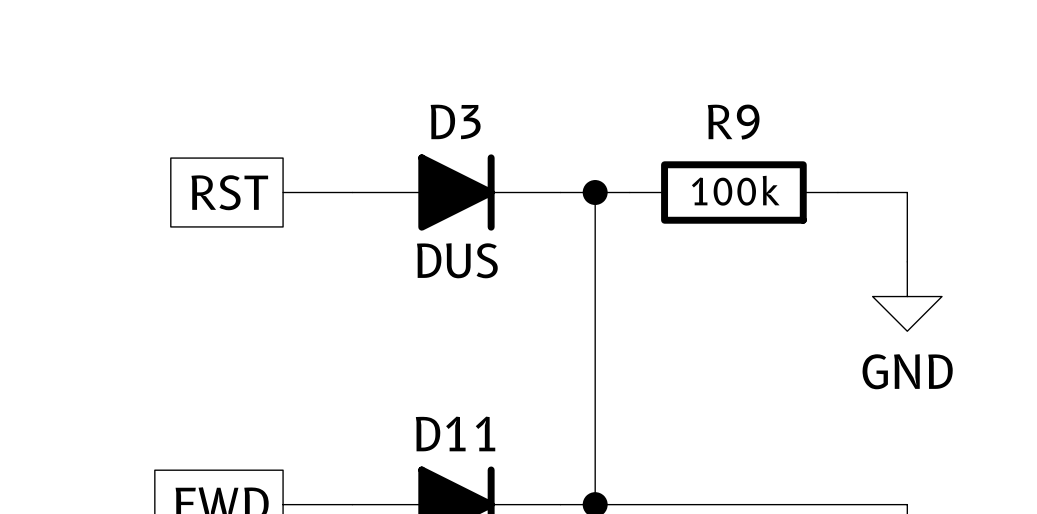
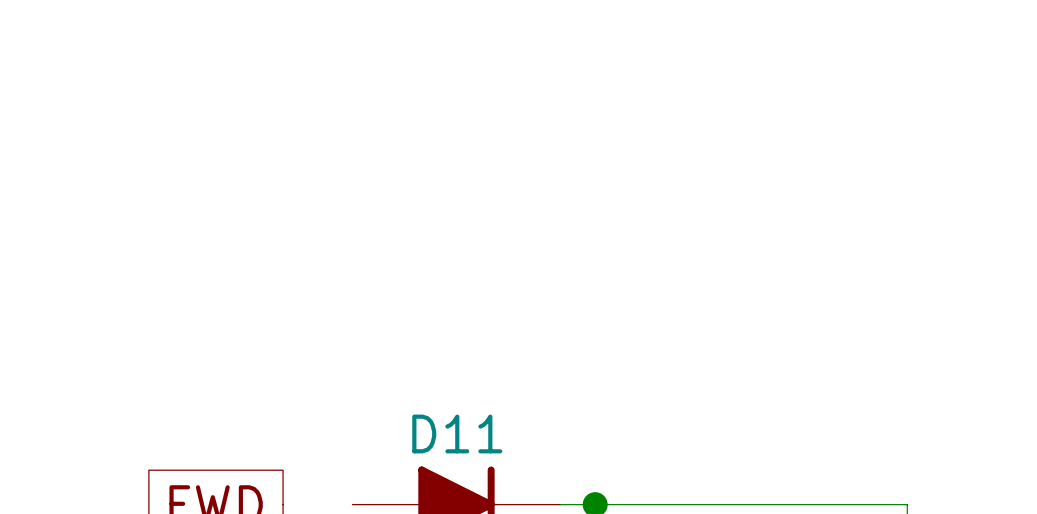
global label: RST (229, 192) -> none
wire: (283, 192) (352, 192) -> none
D3: DUS (456, 192) -> none
wire: (560, 192) (629, 192) -> none
wire: (595, 192) (595, 504) -> none
junction: (595, 192) -> none
R9: 100k (733, 192) -> none
wire: (837, 192) (907, 192) (907, 261) -> none
power symbol: GND (907, 296) -> none
wire: (283, 504) (352, 504) -> none

